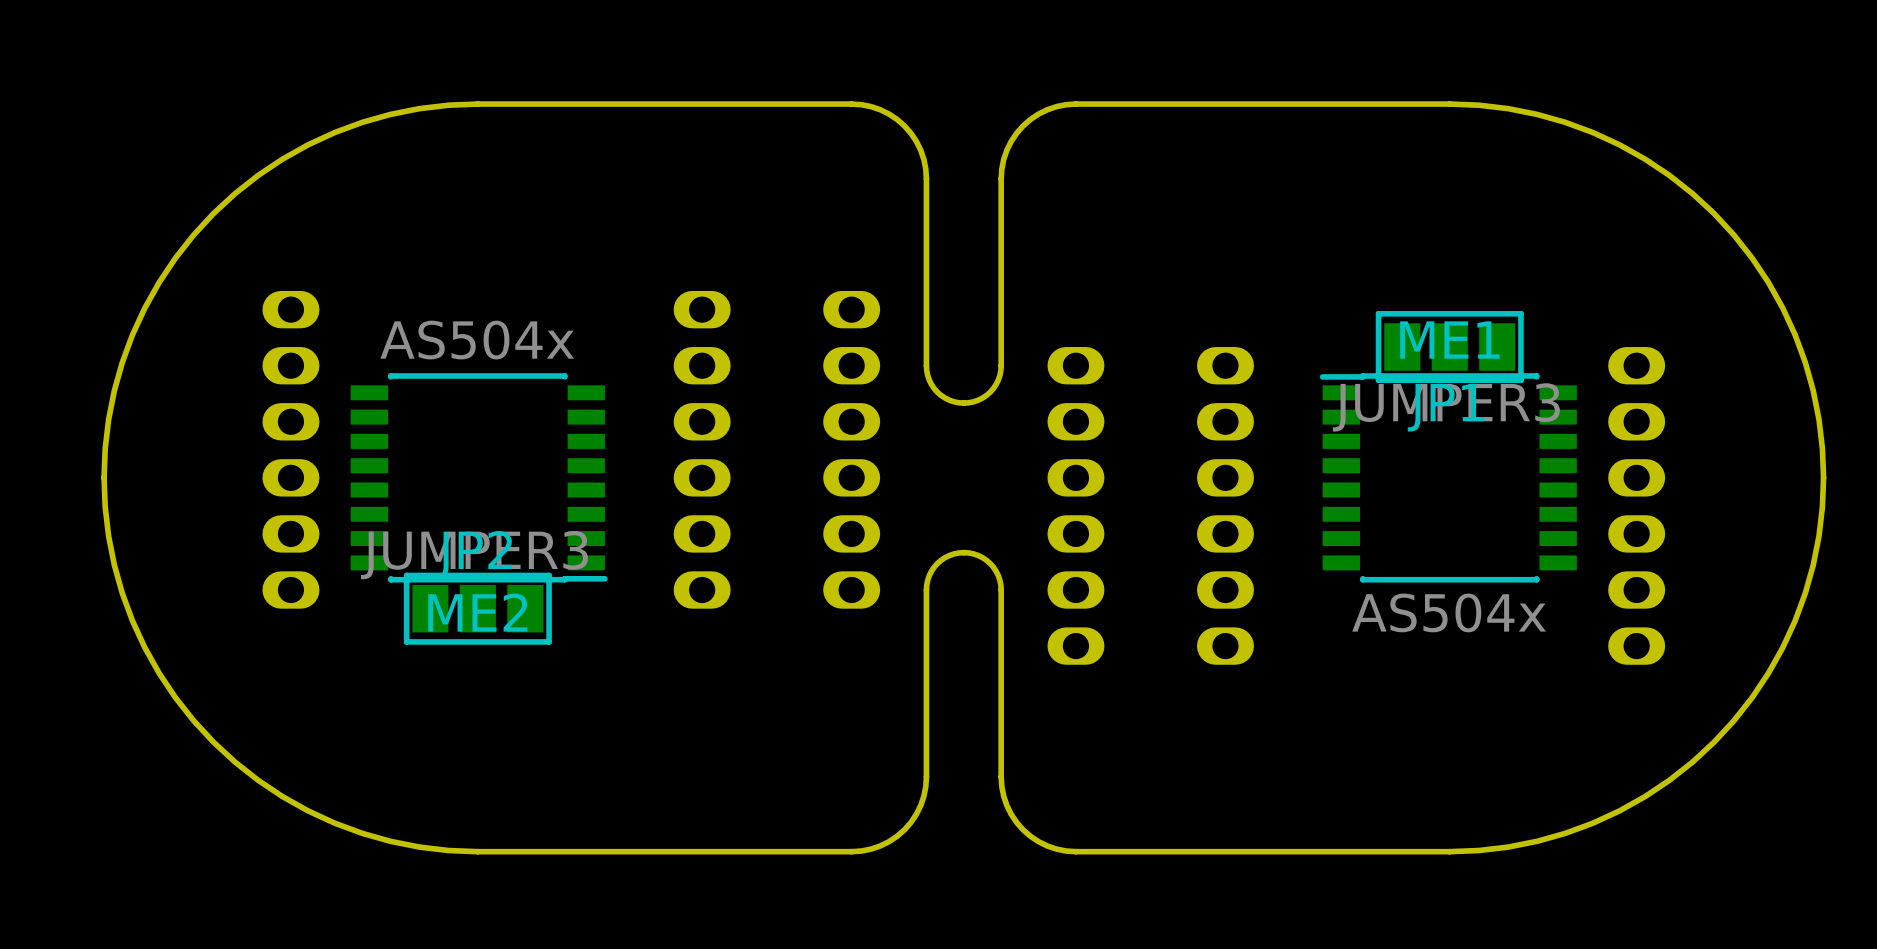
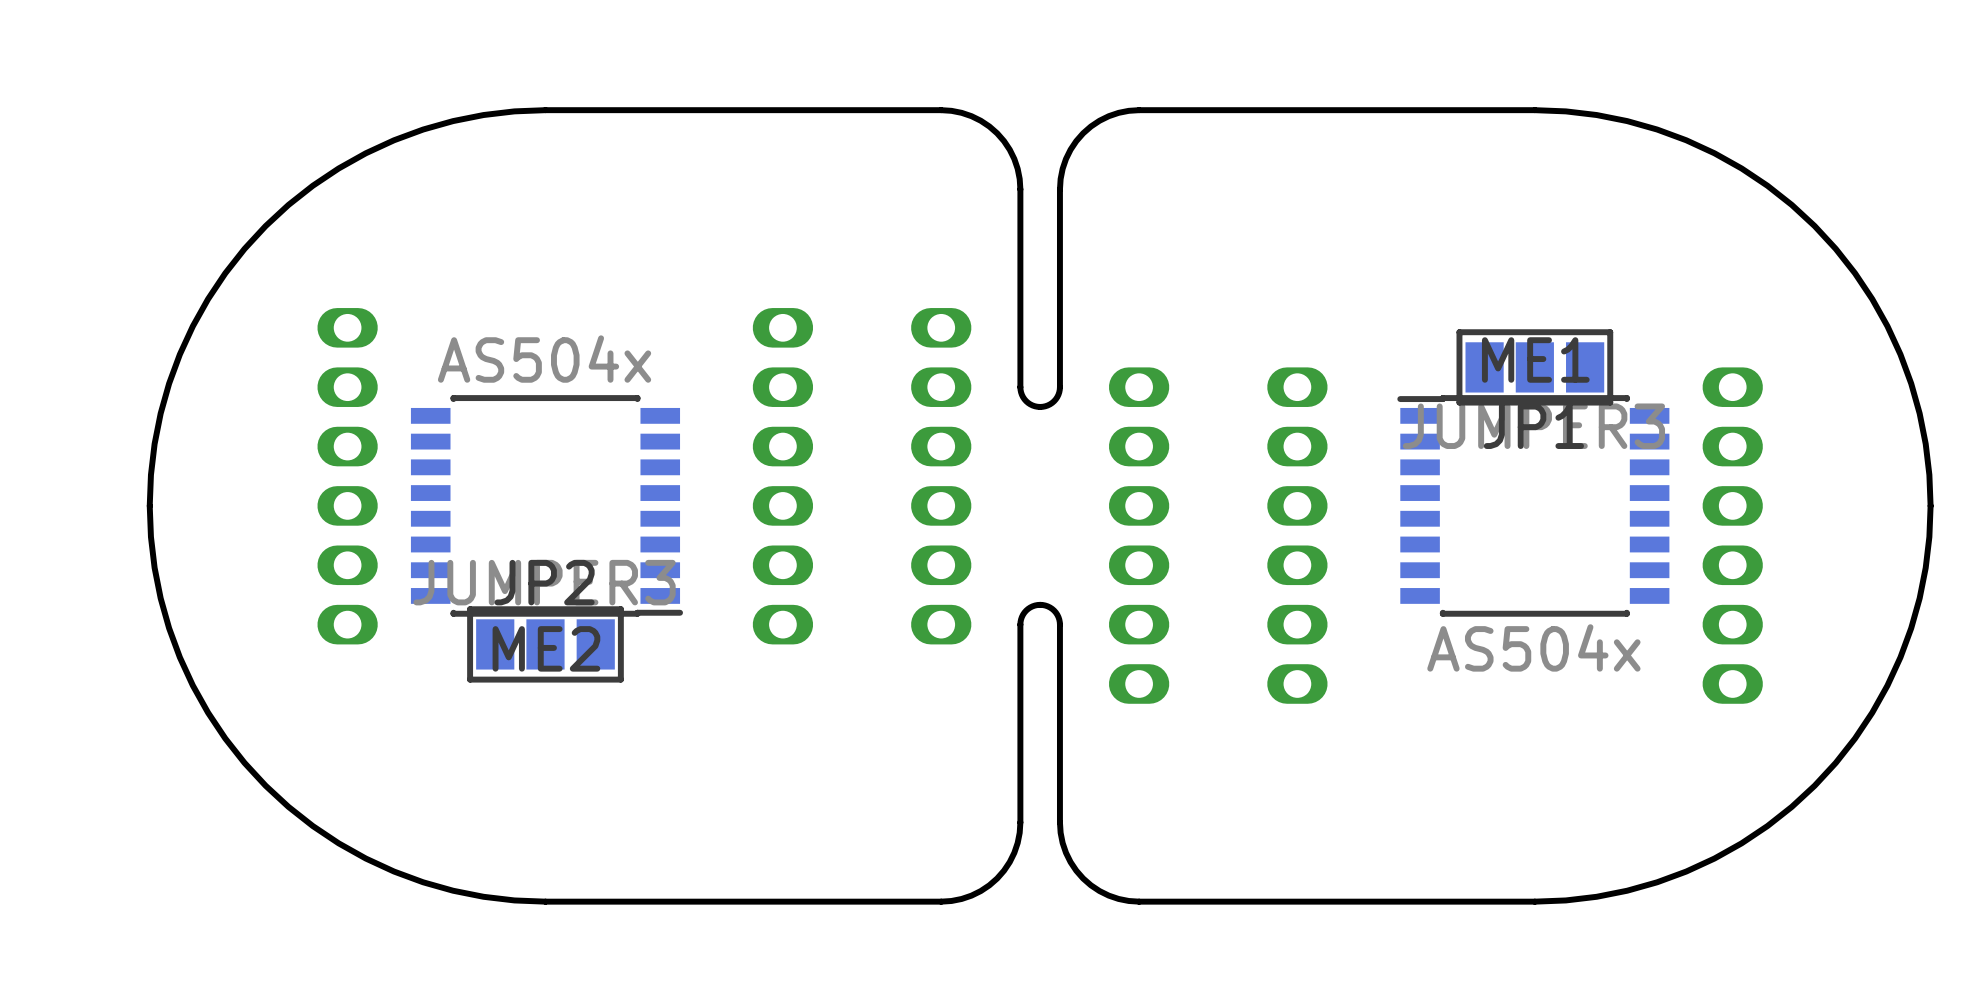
board edge: (515, 104) (448, 105) (419, 108) (362, 122) (308, 144) (258, 175) (235, 193) (193, 235) (159, 282) (144, 308) (122, 362) (114, 390) (108, 419) (104, 477) (108, 536) (114, 565) (132, 620) (159, 673) (175, 697) (213, 742) (235, 762) (258, 780) (308, 810) (362, 833) (419, 847) (448, 850) (515, 851) -> (545, 110) (483, 115) (453, 121) (394, 140) (365, 153) (312, 185) (265, 226) (244, 248) (208, 299) (179, 354) (160, 413) (154, 444) (149, 505) (154, 567) (160, 598) (179, 657) (208, 712) (225, 738) (265, 785) (312, 826) (365, 858) (394, 871) (423, 882) (483, 896) (545, 901)
board edge: (851, 104) (880, 109) (897, 119) (916, 141) (923, 159) (926, 178) (926, 365) (931, 384) (937, 392) (949, 400) (963, 403) (973, 401) (982, 398) (993, 388) (999, 375) (1001, 365) -> (901, 110) (951, 110) (971, 116) (989, 126) (1009, 149) (1017, 168) (1020, 189) (1021, 392) (1028, 402) (1035, 406) (1042, 406) (1054, 401) (1058, 394) (1059, 387)
part position: (290, 449) -> (347, 476)
part position: (702, 449) -> (782, 476)
part position: (851, 449) -> (941, 476)
ME2 position: (479, 477) -> (546, 505)
board edge: (1001, 590) (999, 580) (993, 567) (982, 557) (973, 553) (958, 552) (949, 555) (937, 563) (931, 571) (926, 590) (926, 776) (923, 796) (916, 814) (897, 836) (880, 845) (851, 851) -> (1059, 624) (1058, 617) (1054, 610) (1042, 605) (1035, 605) (1028, 608) (1021, 619) (1020, 822) (1017, 842) (1009, 862) (997, 878) (971, 895) (951, 900) (901, 901)
JP2 position: (477, 608) -> (545, 644)

